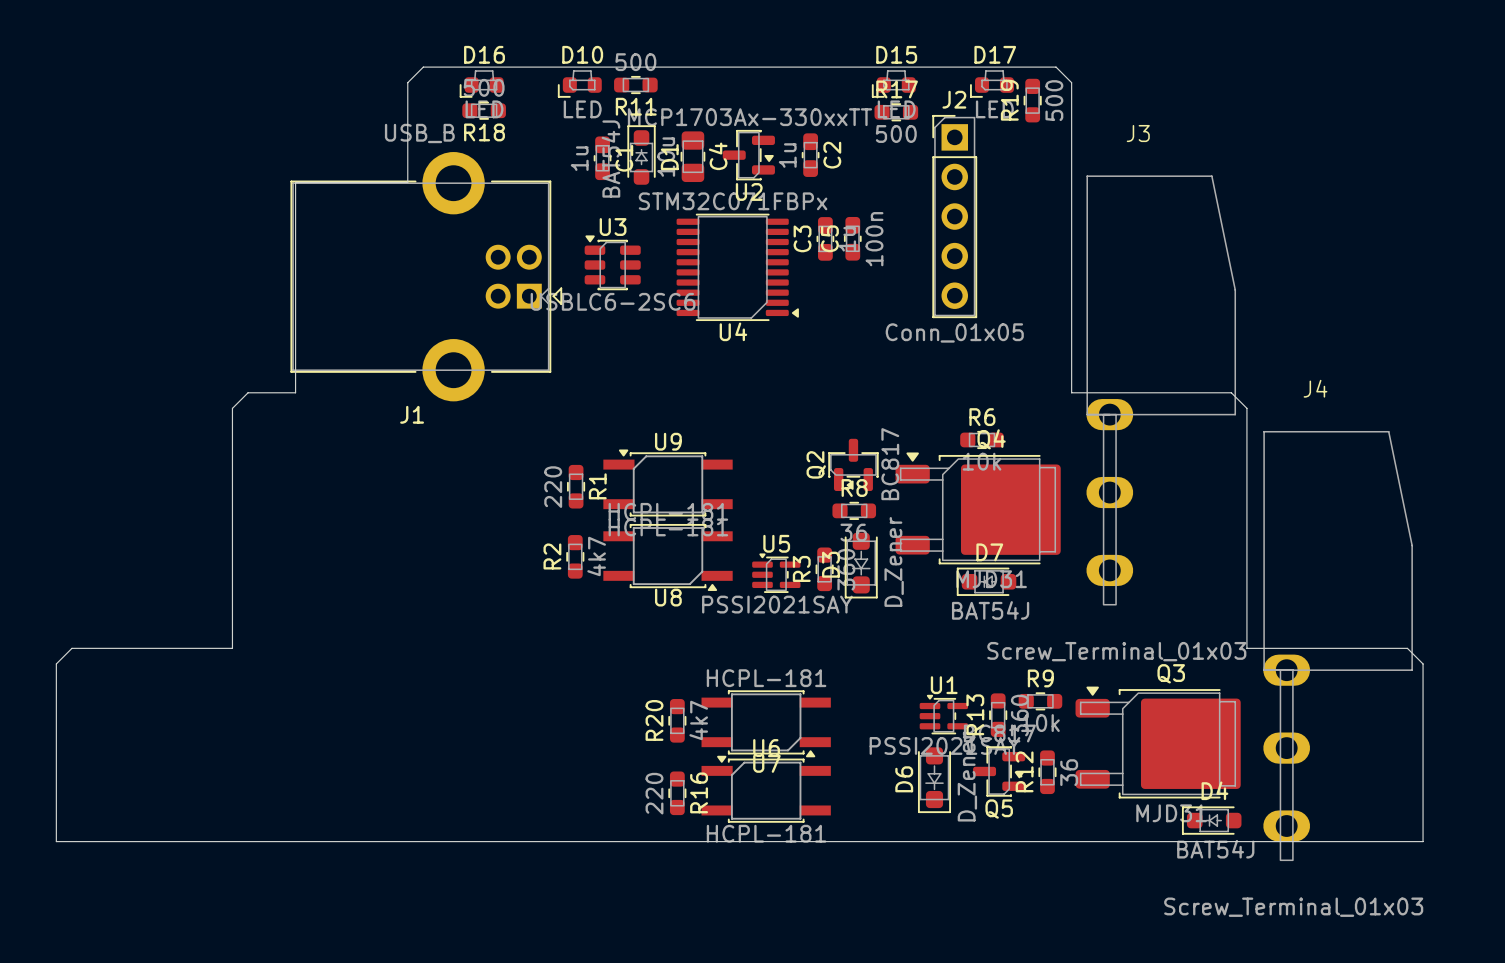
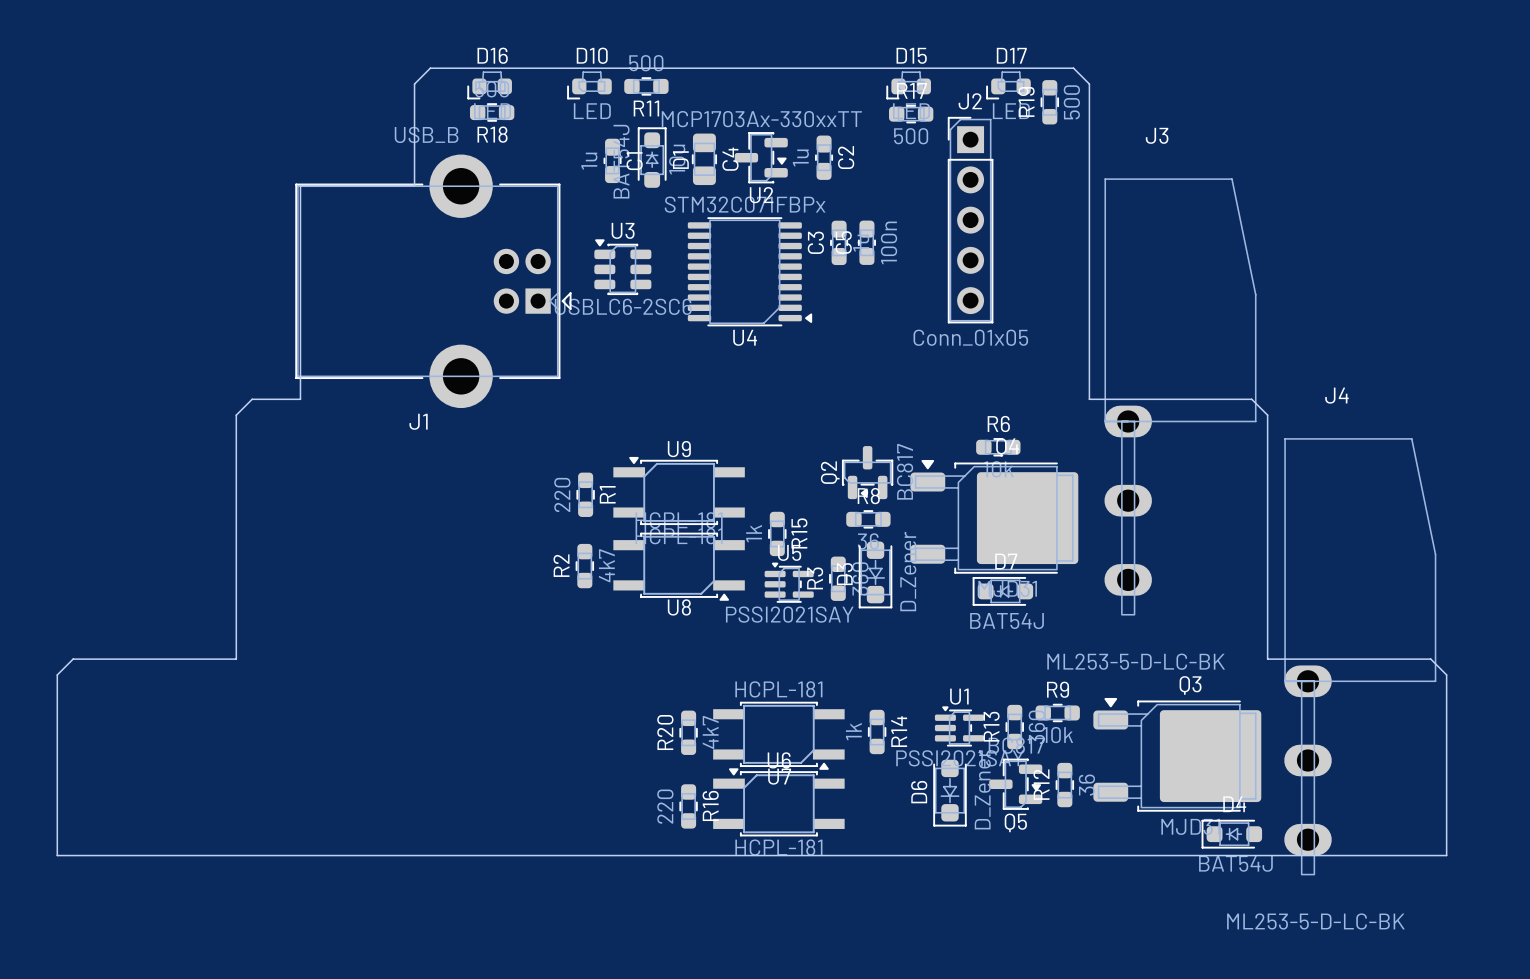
R15: none -> 1k (777, 533)
J3 value: Screw_Terminal_01x03 (1116, 651) -> ML253-5-D-LC-BK (1136, 661)
R14: none -> 1k (877, 731)
J4 value: Screw_Terminal_01x03 (1293, 907) -> ML253-5-D-LC-BK (1315, 921)

